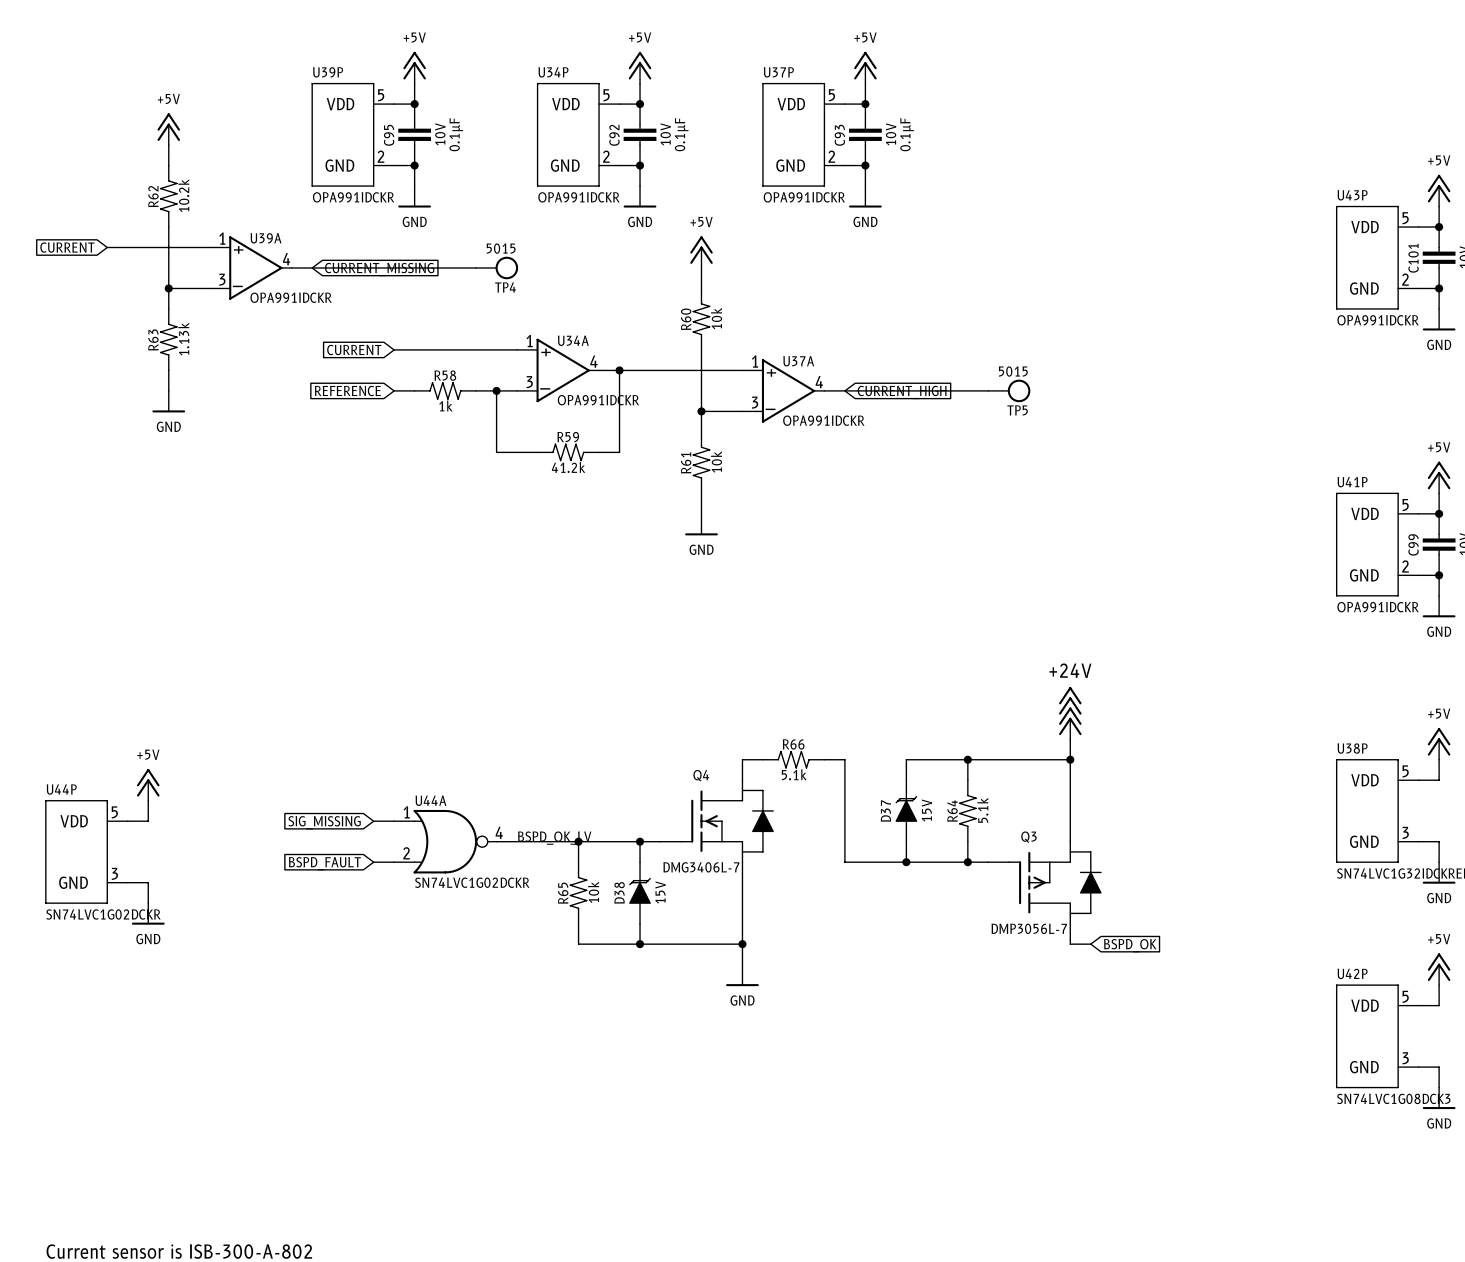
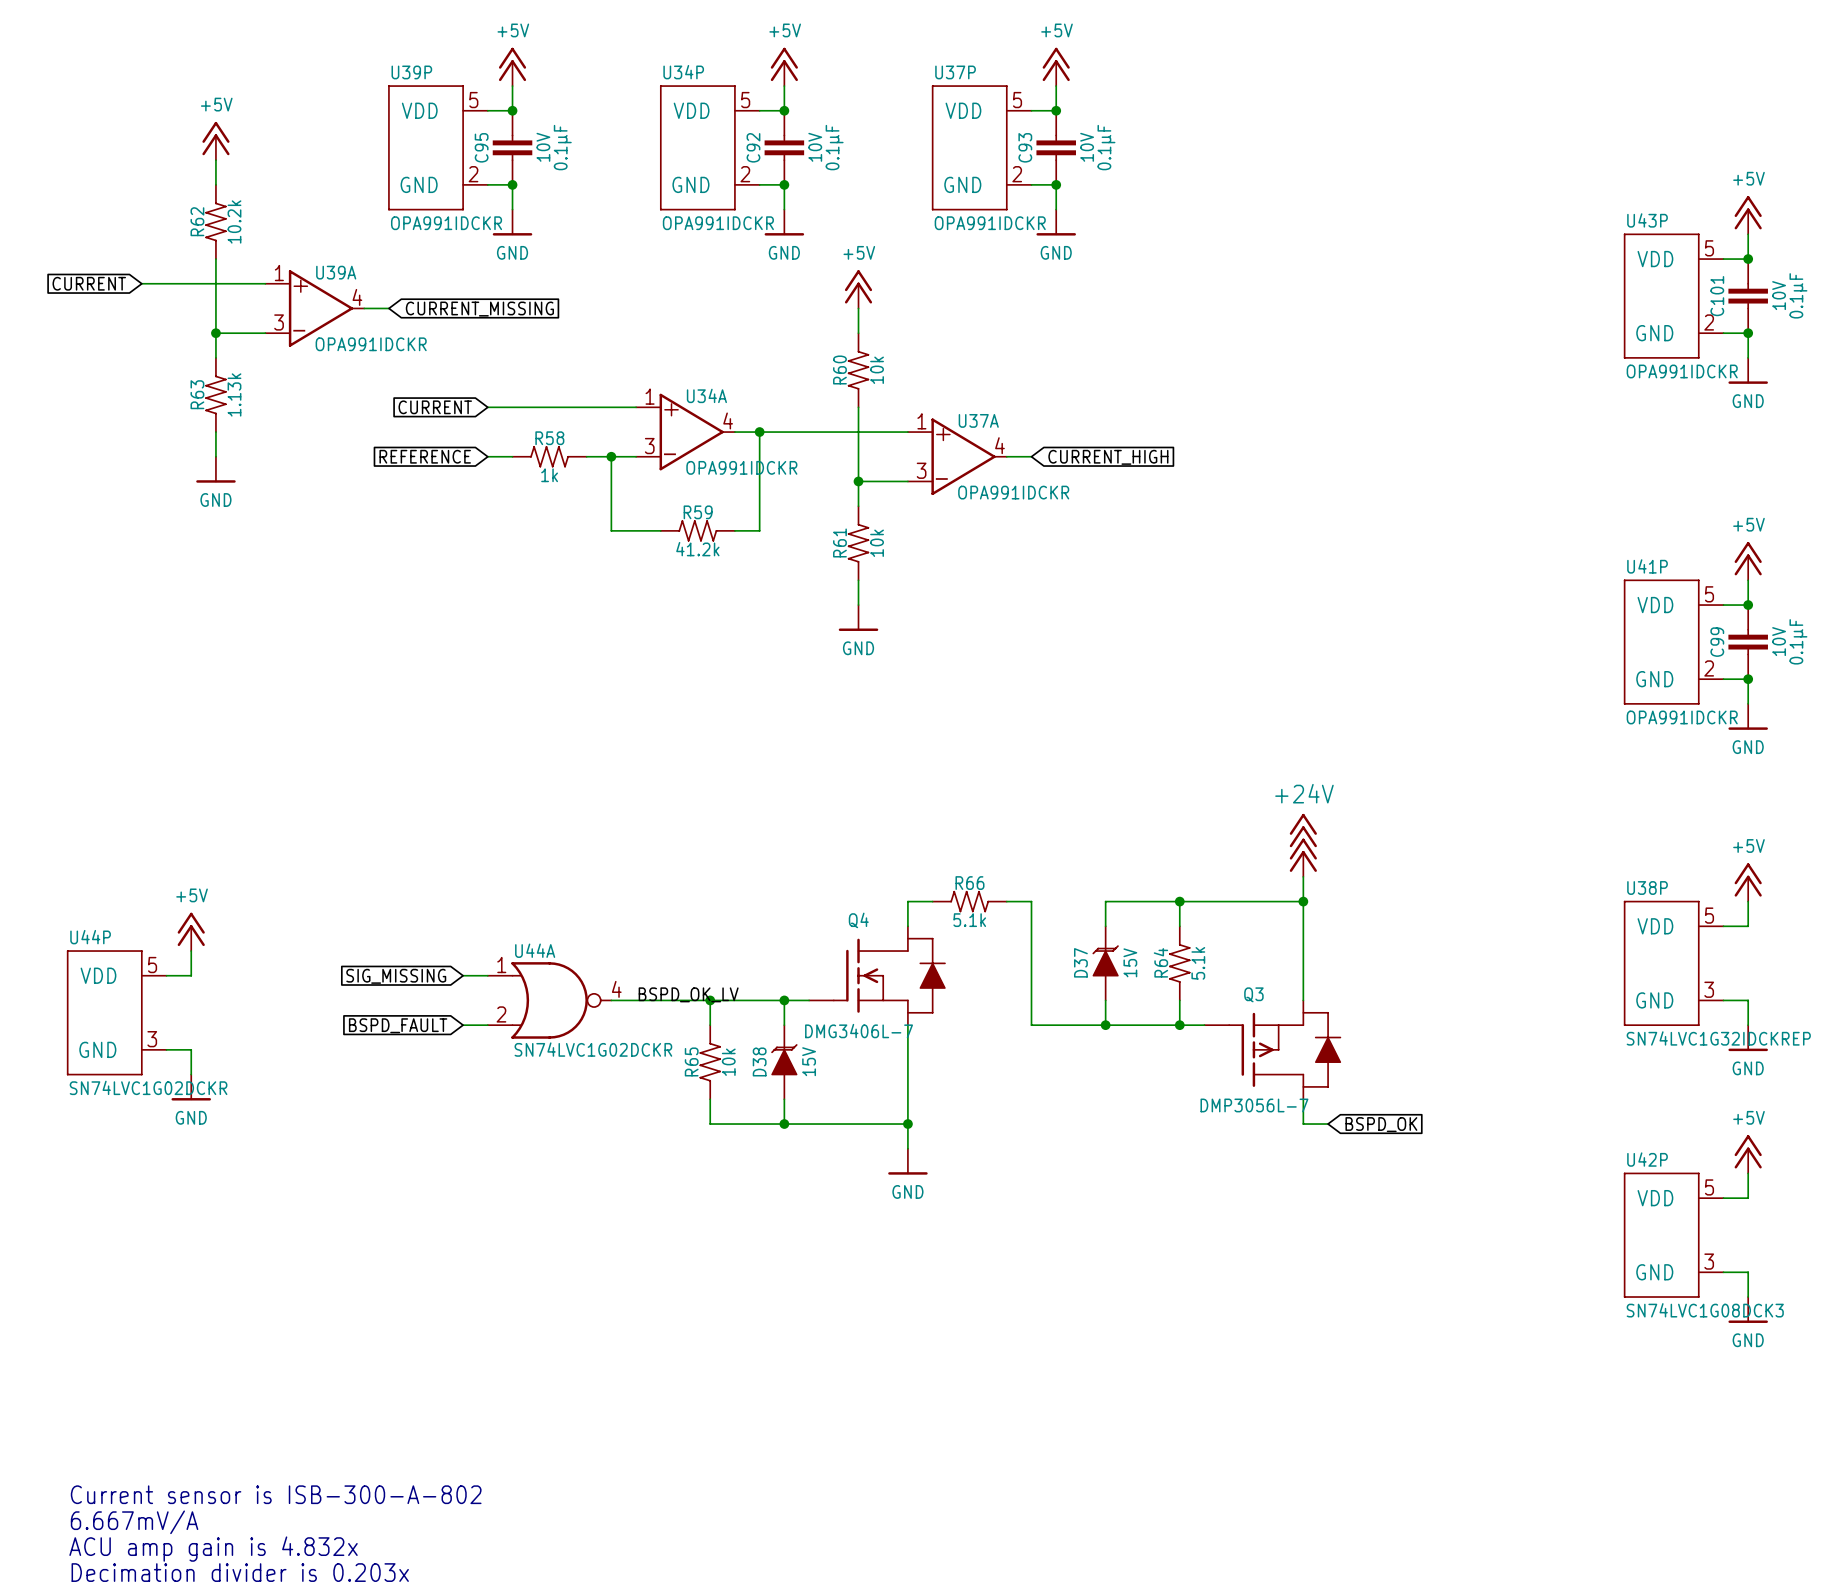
wire: (312, 267) (476, 267) -> none
TP4: (497, 267) -> none
wire: (844, 390) (988, 390) -> none
TP5: (1009, 390) -> none

